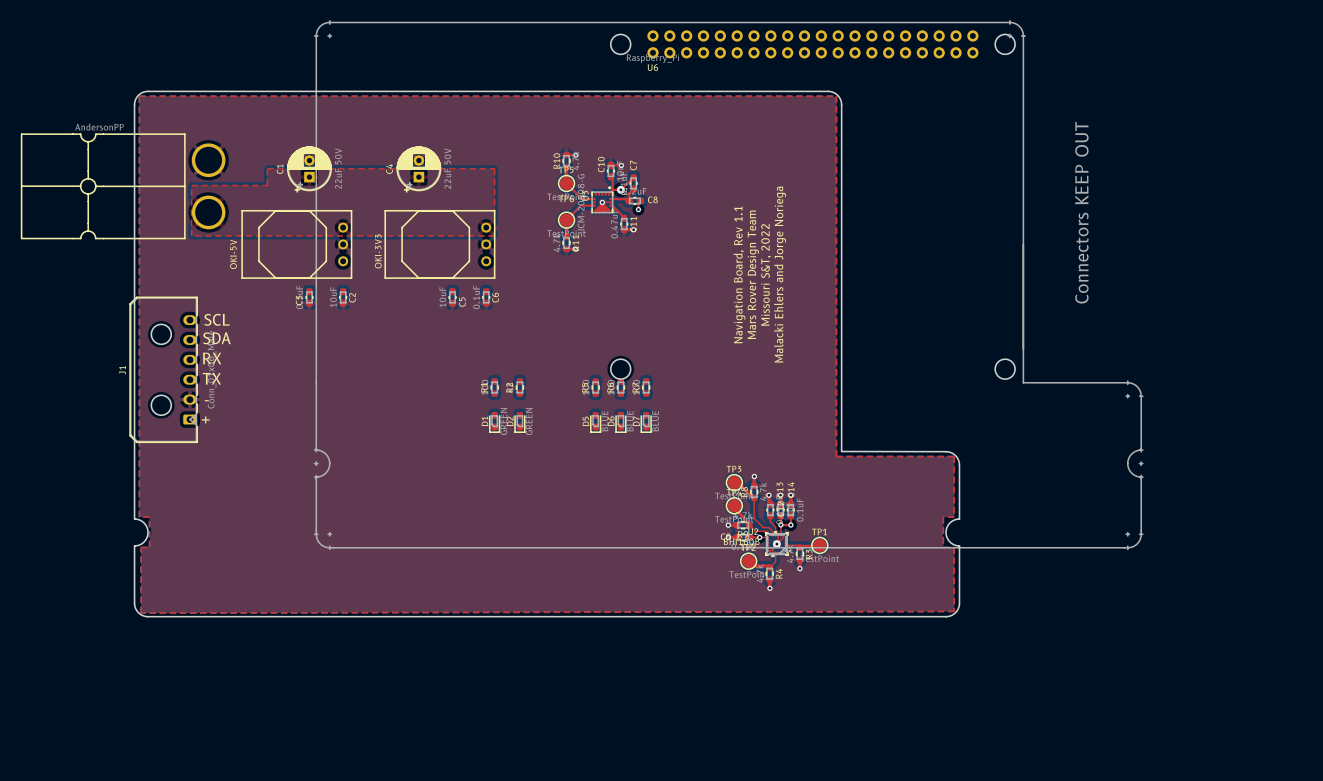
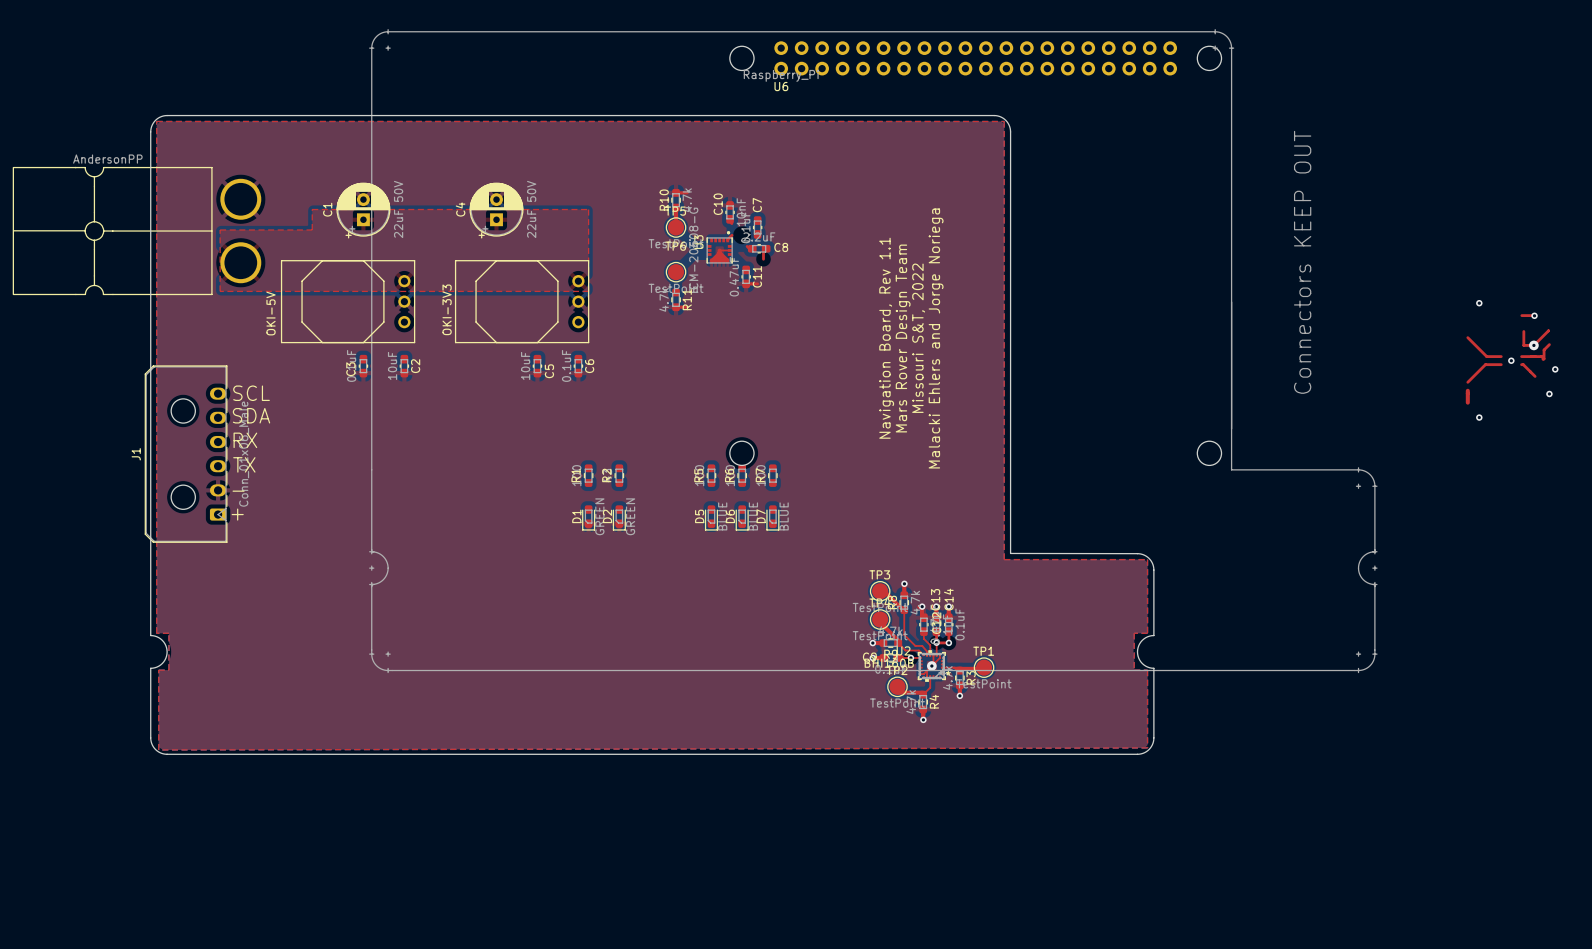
via: (575, 155) -> none
top track: (610, 165) (621, 165) -> none
via: (621, 165) -> none
top track: (632, 177) (620, 189) (612, 189) (612, 178) -> none
top track: (566, 183) (582, 199) (594, 199) -> none
via: (620, 189) -> none
top track: (633, 189) (629, 193) (629, 200) (627, 199) (610, 199) -> none
via: (602, 202) -> none
top track: (594, 205) (581, 205) (566, 220) -> none
top track: (610, 205) (621, 215) -> none
via: (638, 209) -> none
top track: (566, 227) (566, 236) -> none
via: (633, 229) -> none
via: none -> (1479, 303)
via: (575, 249) -> none
top track: none -> (1521, 315) (1534, 315)
via: none -> (1534, 315)
top track: none -> (1548, 330) (1533, 345) (1523, 345) (1523, 331)
top track: none -> (1467, 337) (1486, 356) (1501, 356)
top track: none -> (1549, 344) (1544, 349) (1544, 358) (1541, 356) (1521, 356)
via: none -> (1533, 345)
top track: none -> (1542, 359) (1543, 359)
via: none -> (1511, 360)
top track: none -> (1501, 364) (1485, 364) (1467, 382)
top track: none -> (1521, 364) (1535, 376)
via: none -> (1555, 369)
top track: none -> (1467, 390) (1467, 402)
via: none -> (1549, 393)
via: none -> (1479, 417)

